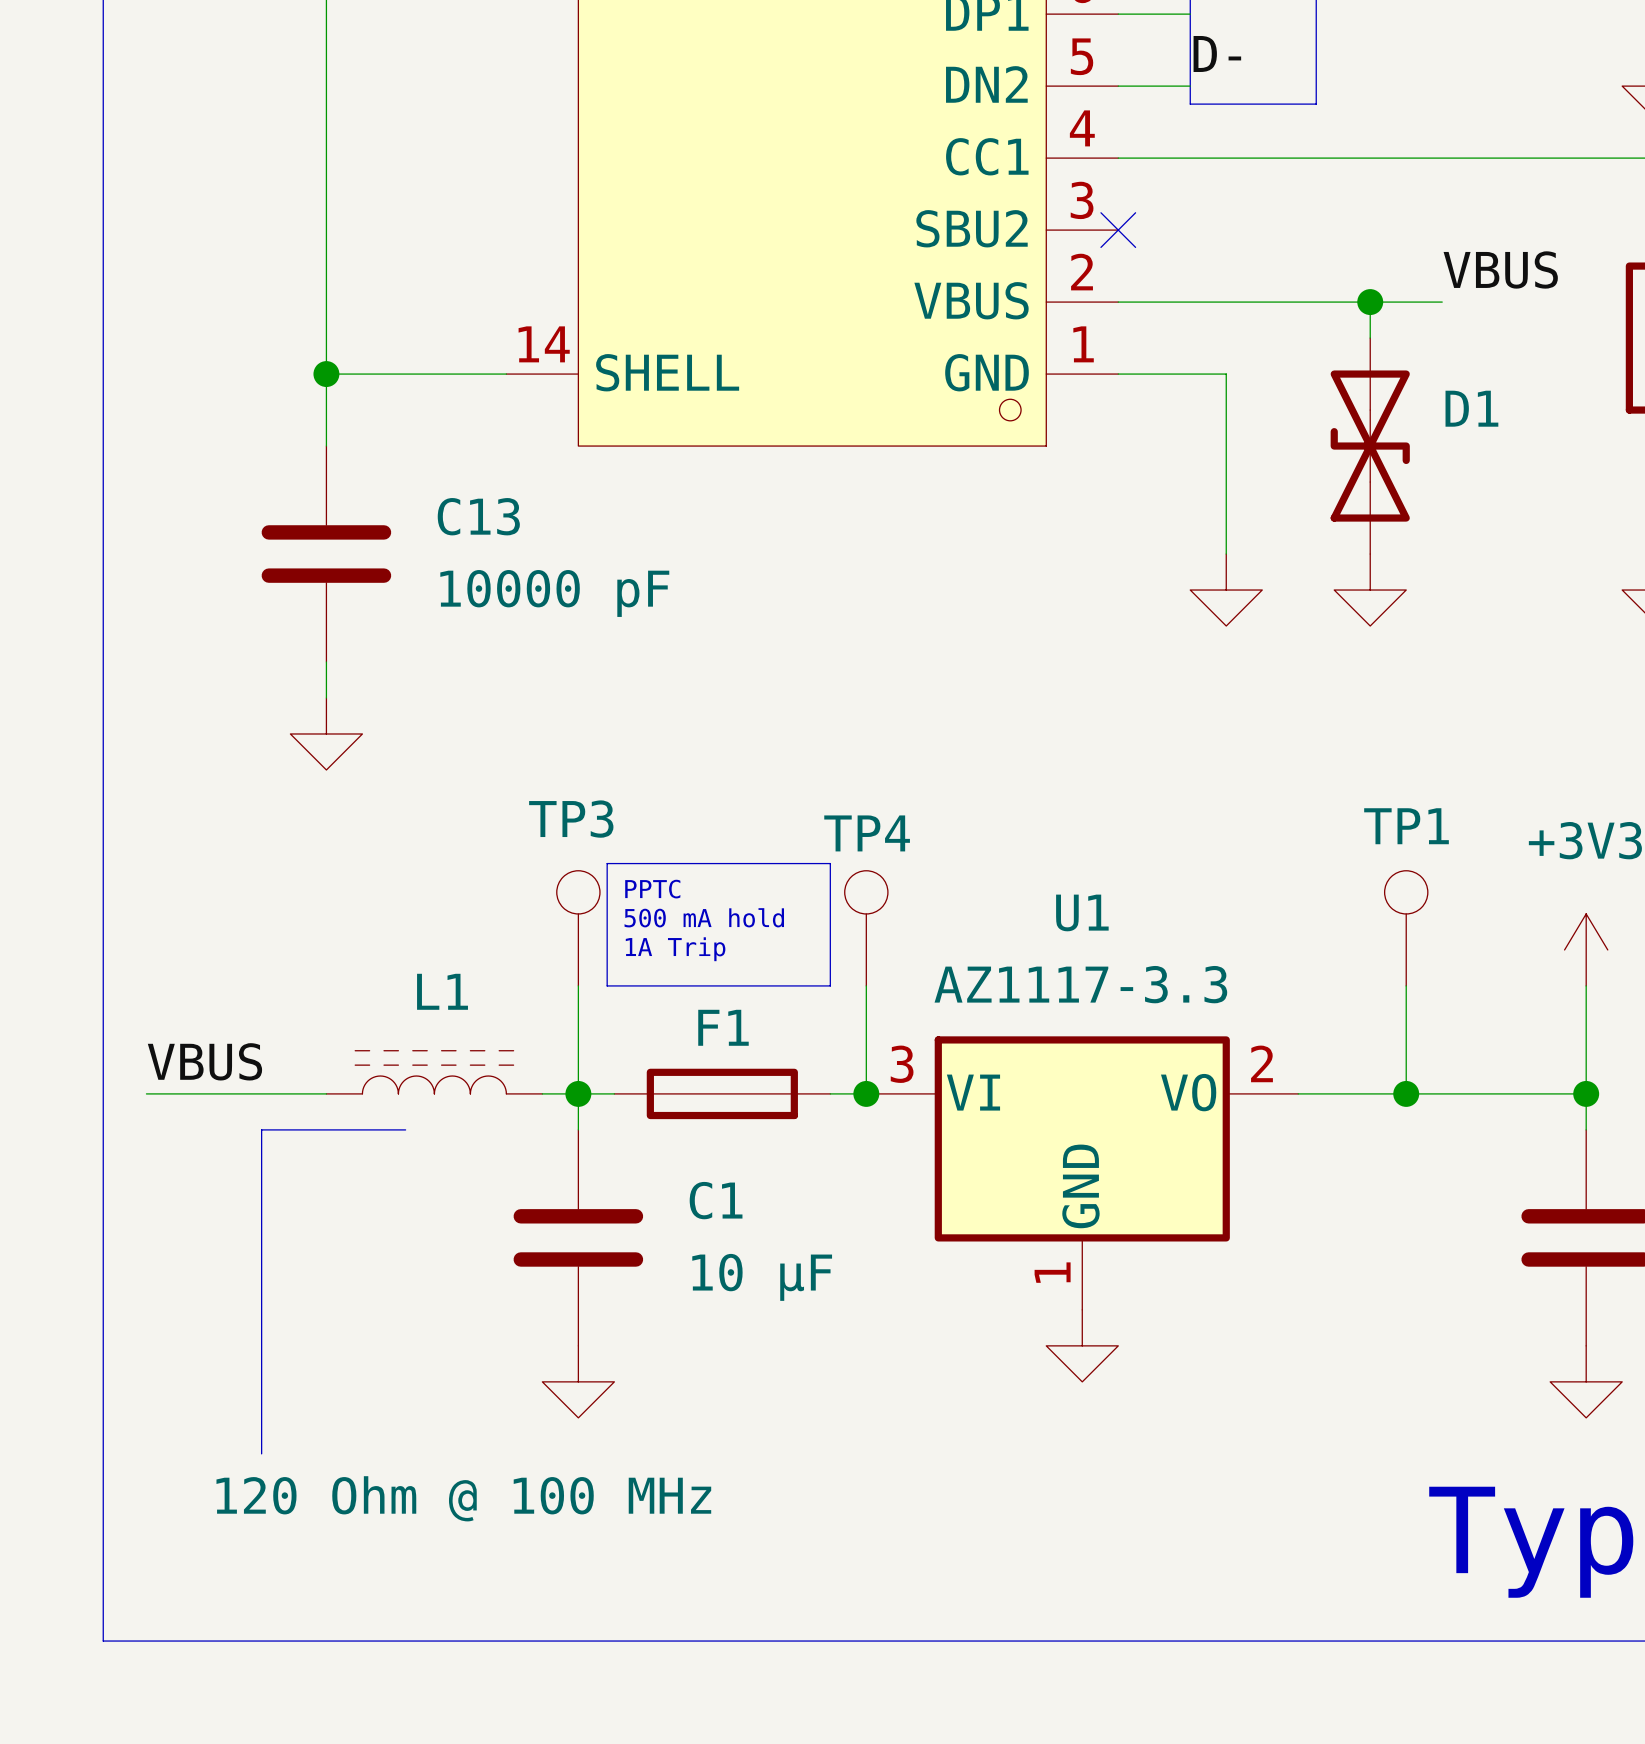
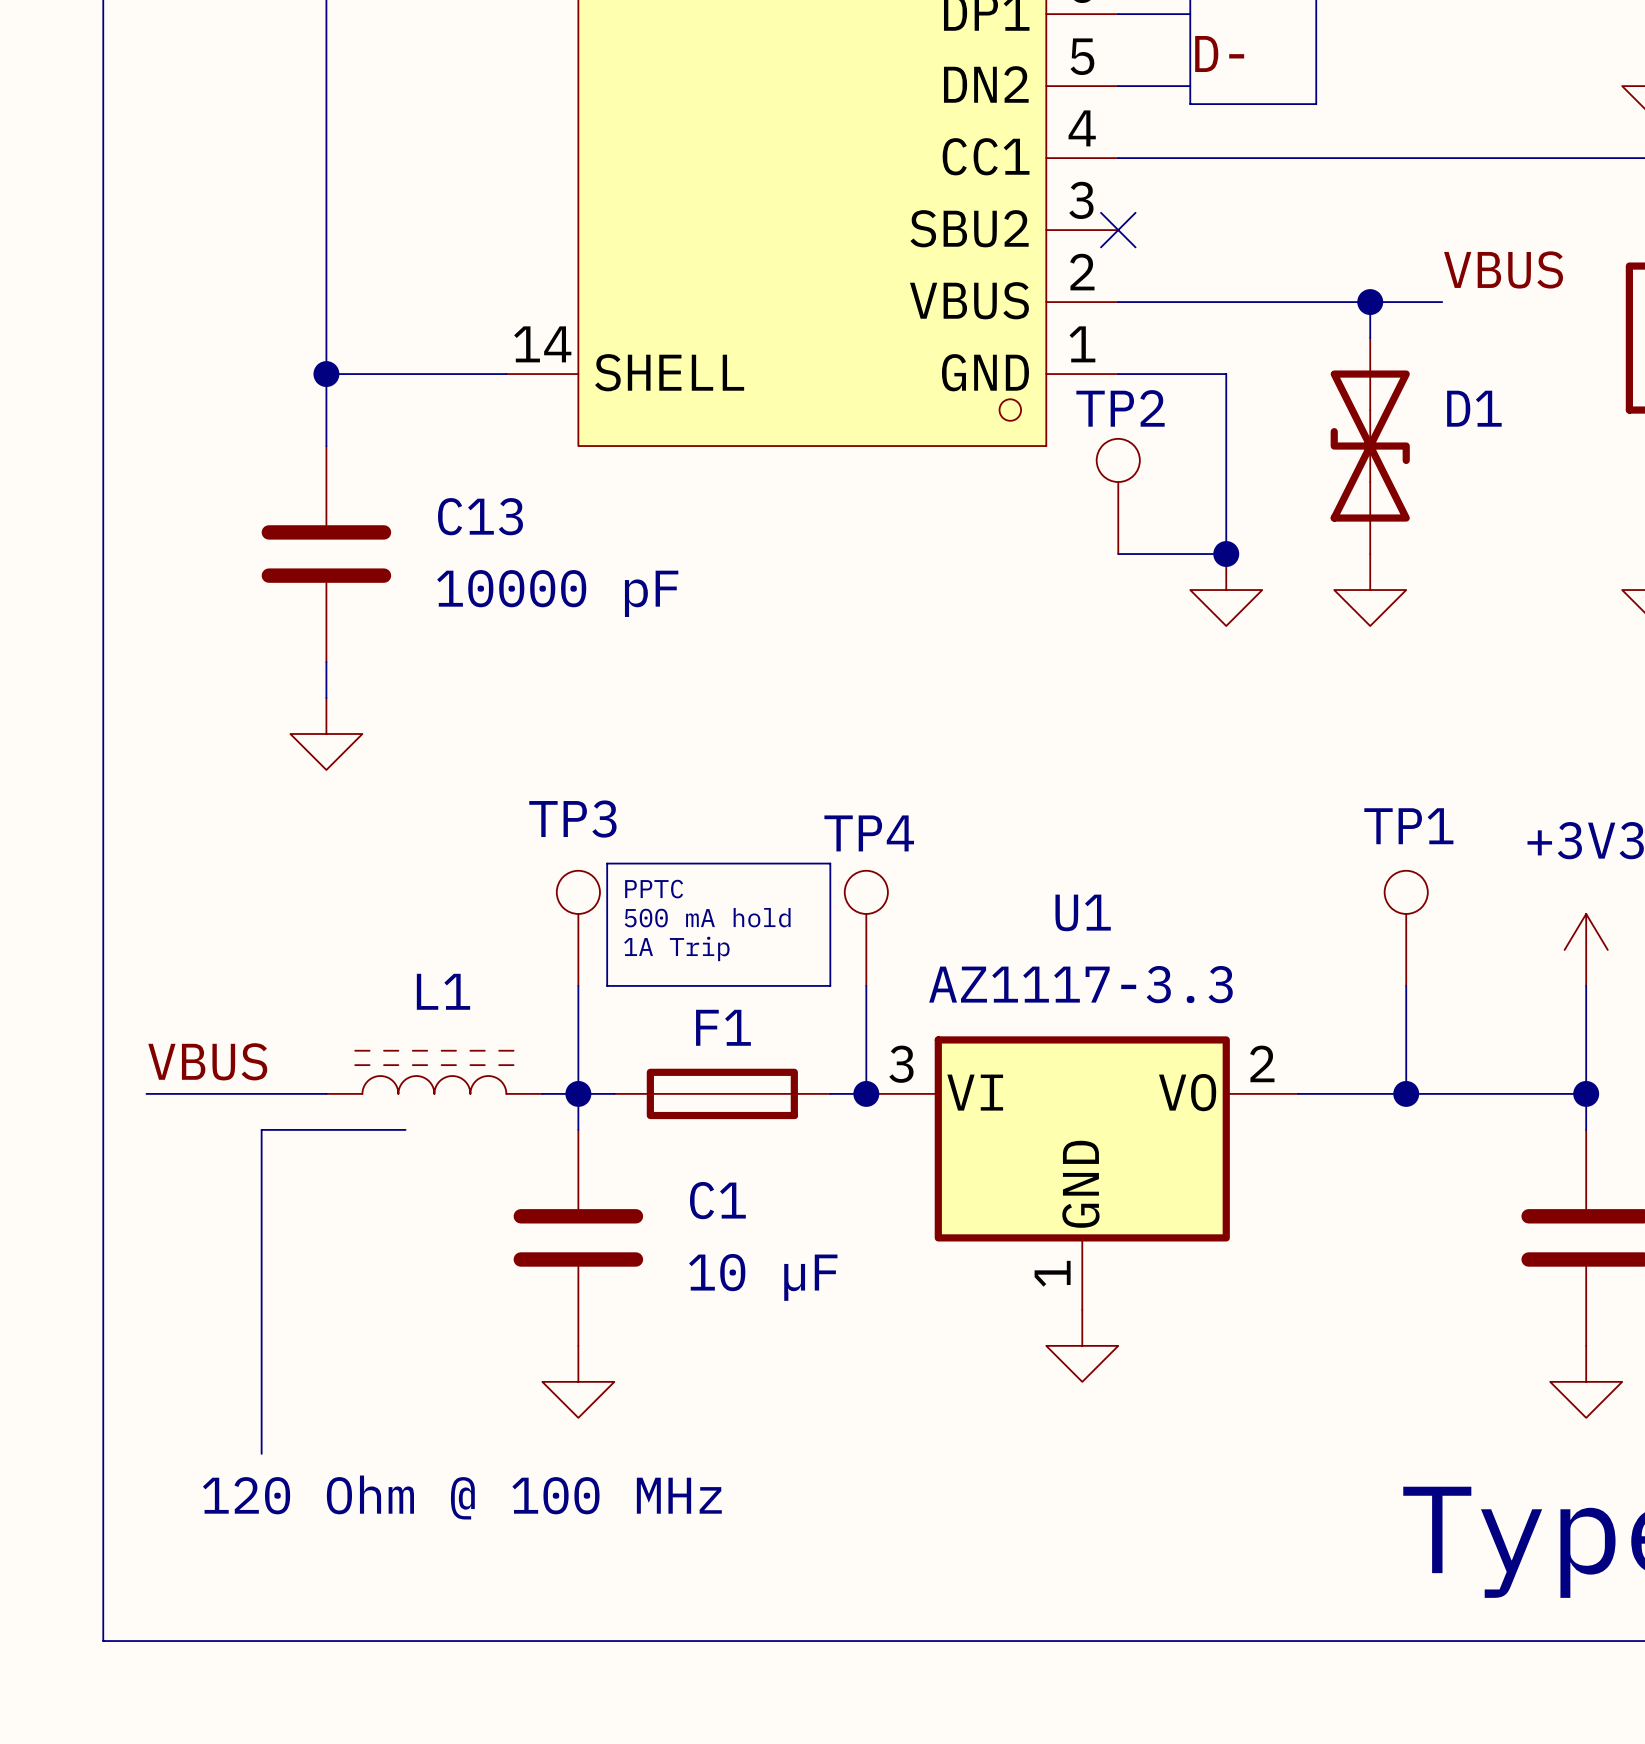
TP2: none -> (1118, 496)
wire: none -> (1118, 554) (1226, 554)
junction: none -> (1226, 554)

